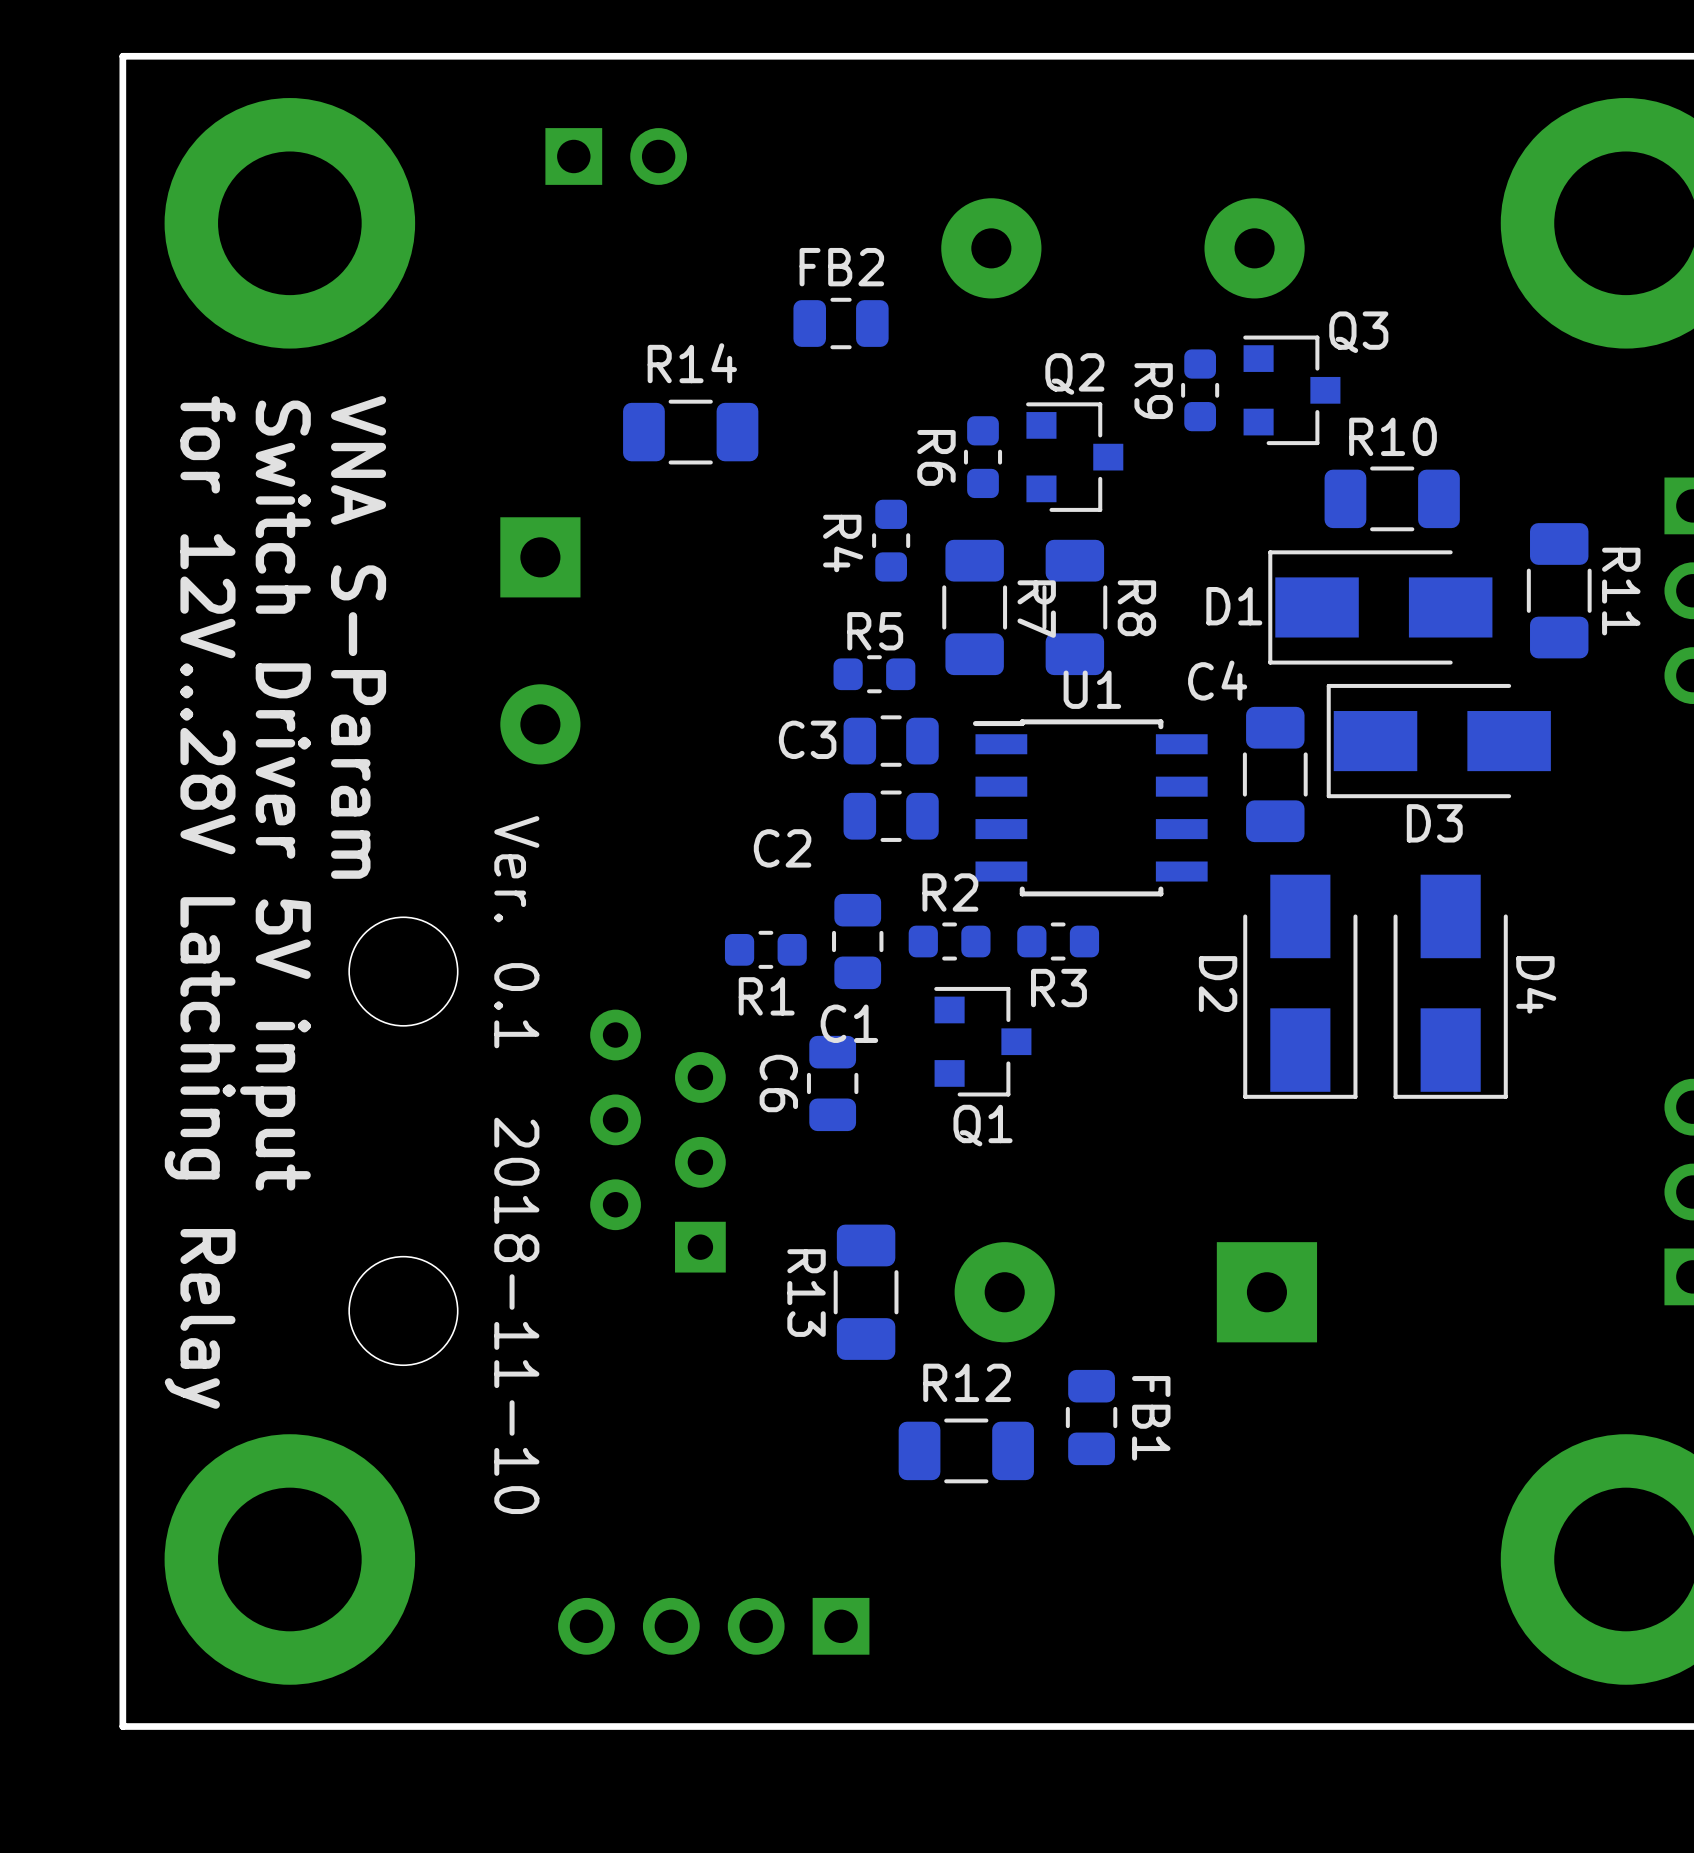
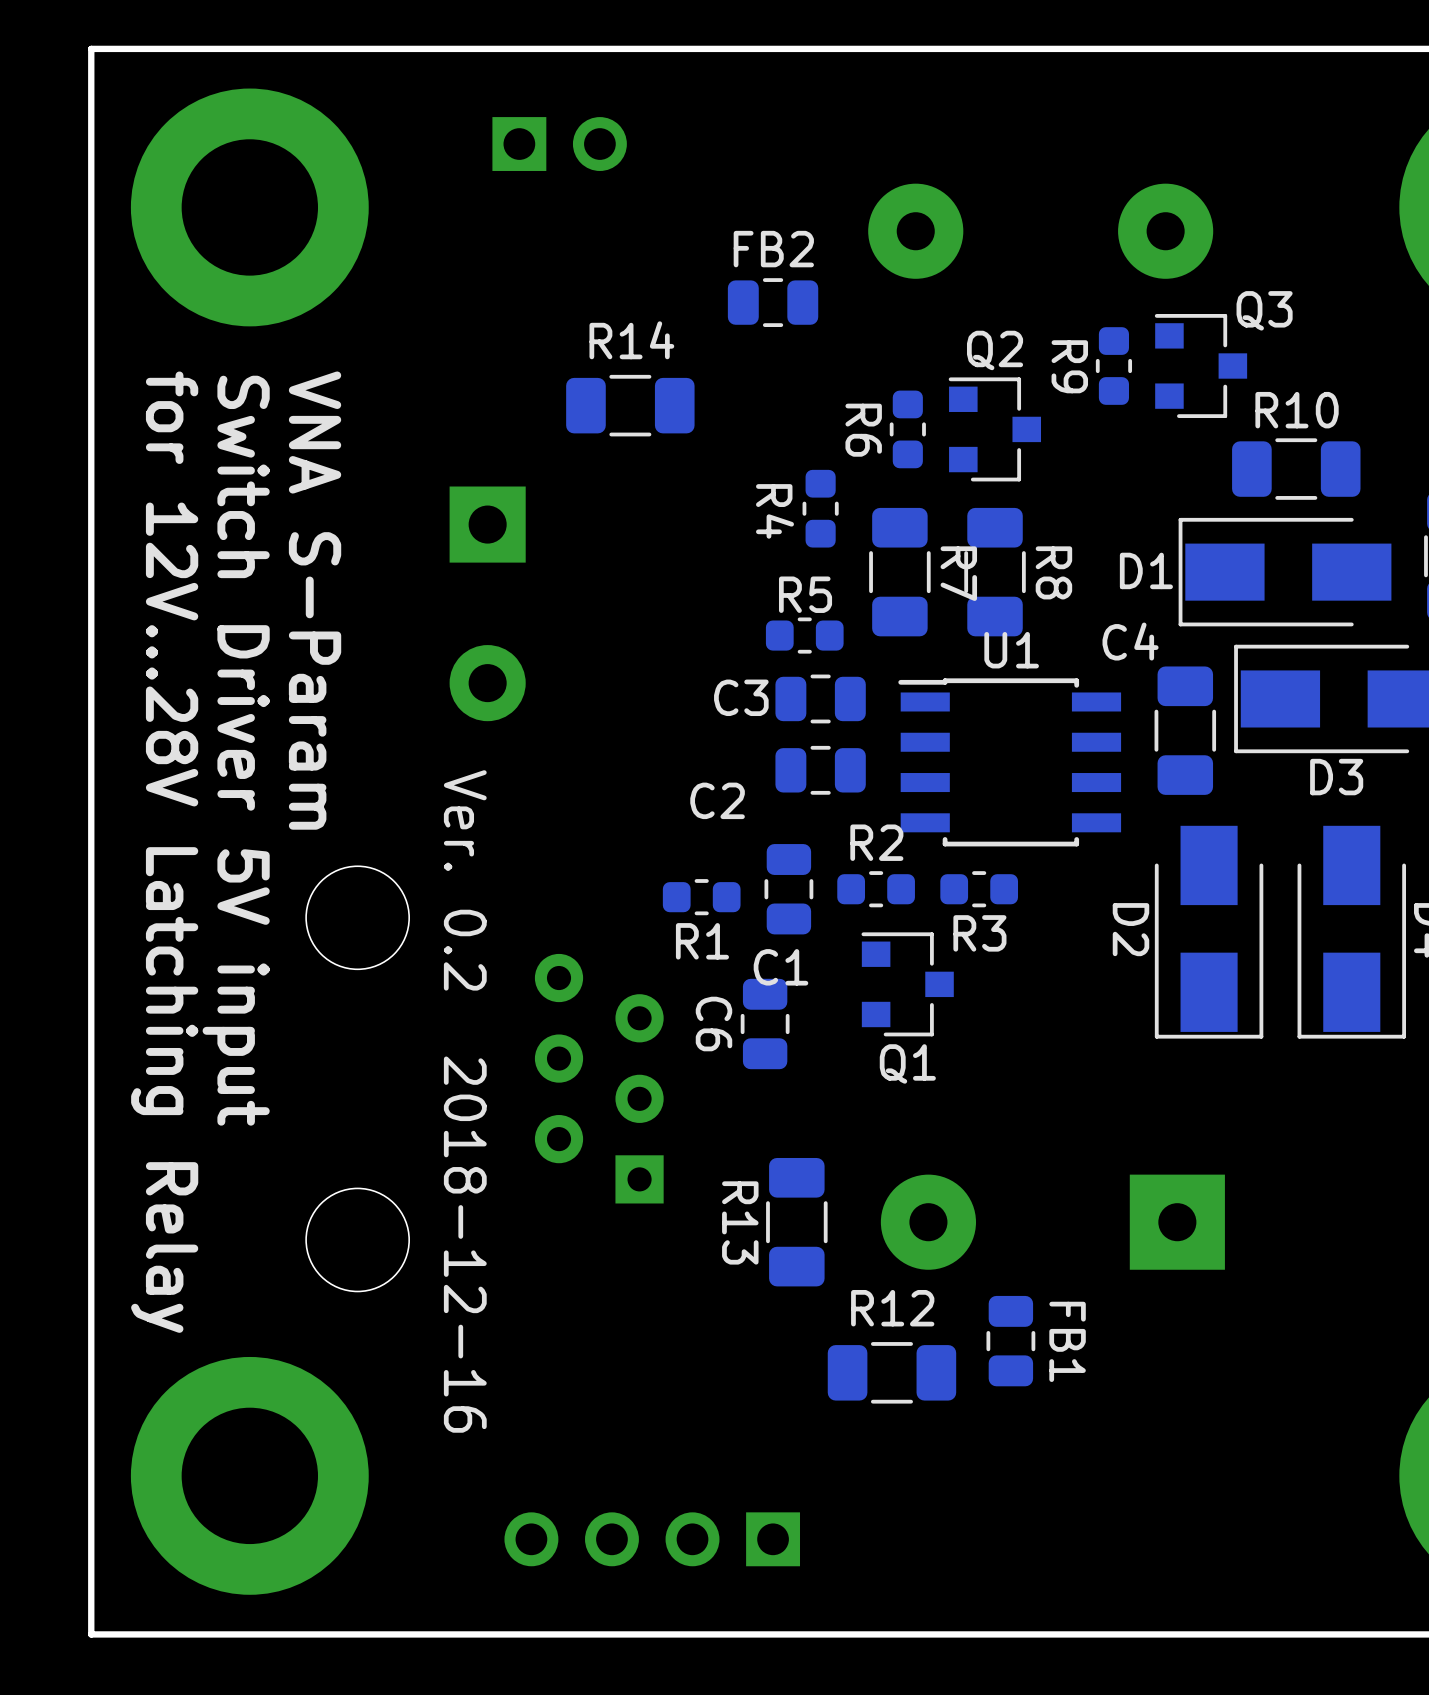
text: Ver. 0.1 2018-11-10 (516, 1165) -> Ver. 0.2 2018-12-16 (465, 1101)

